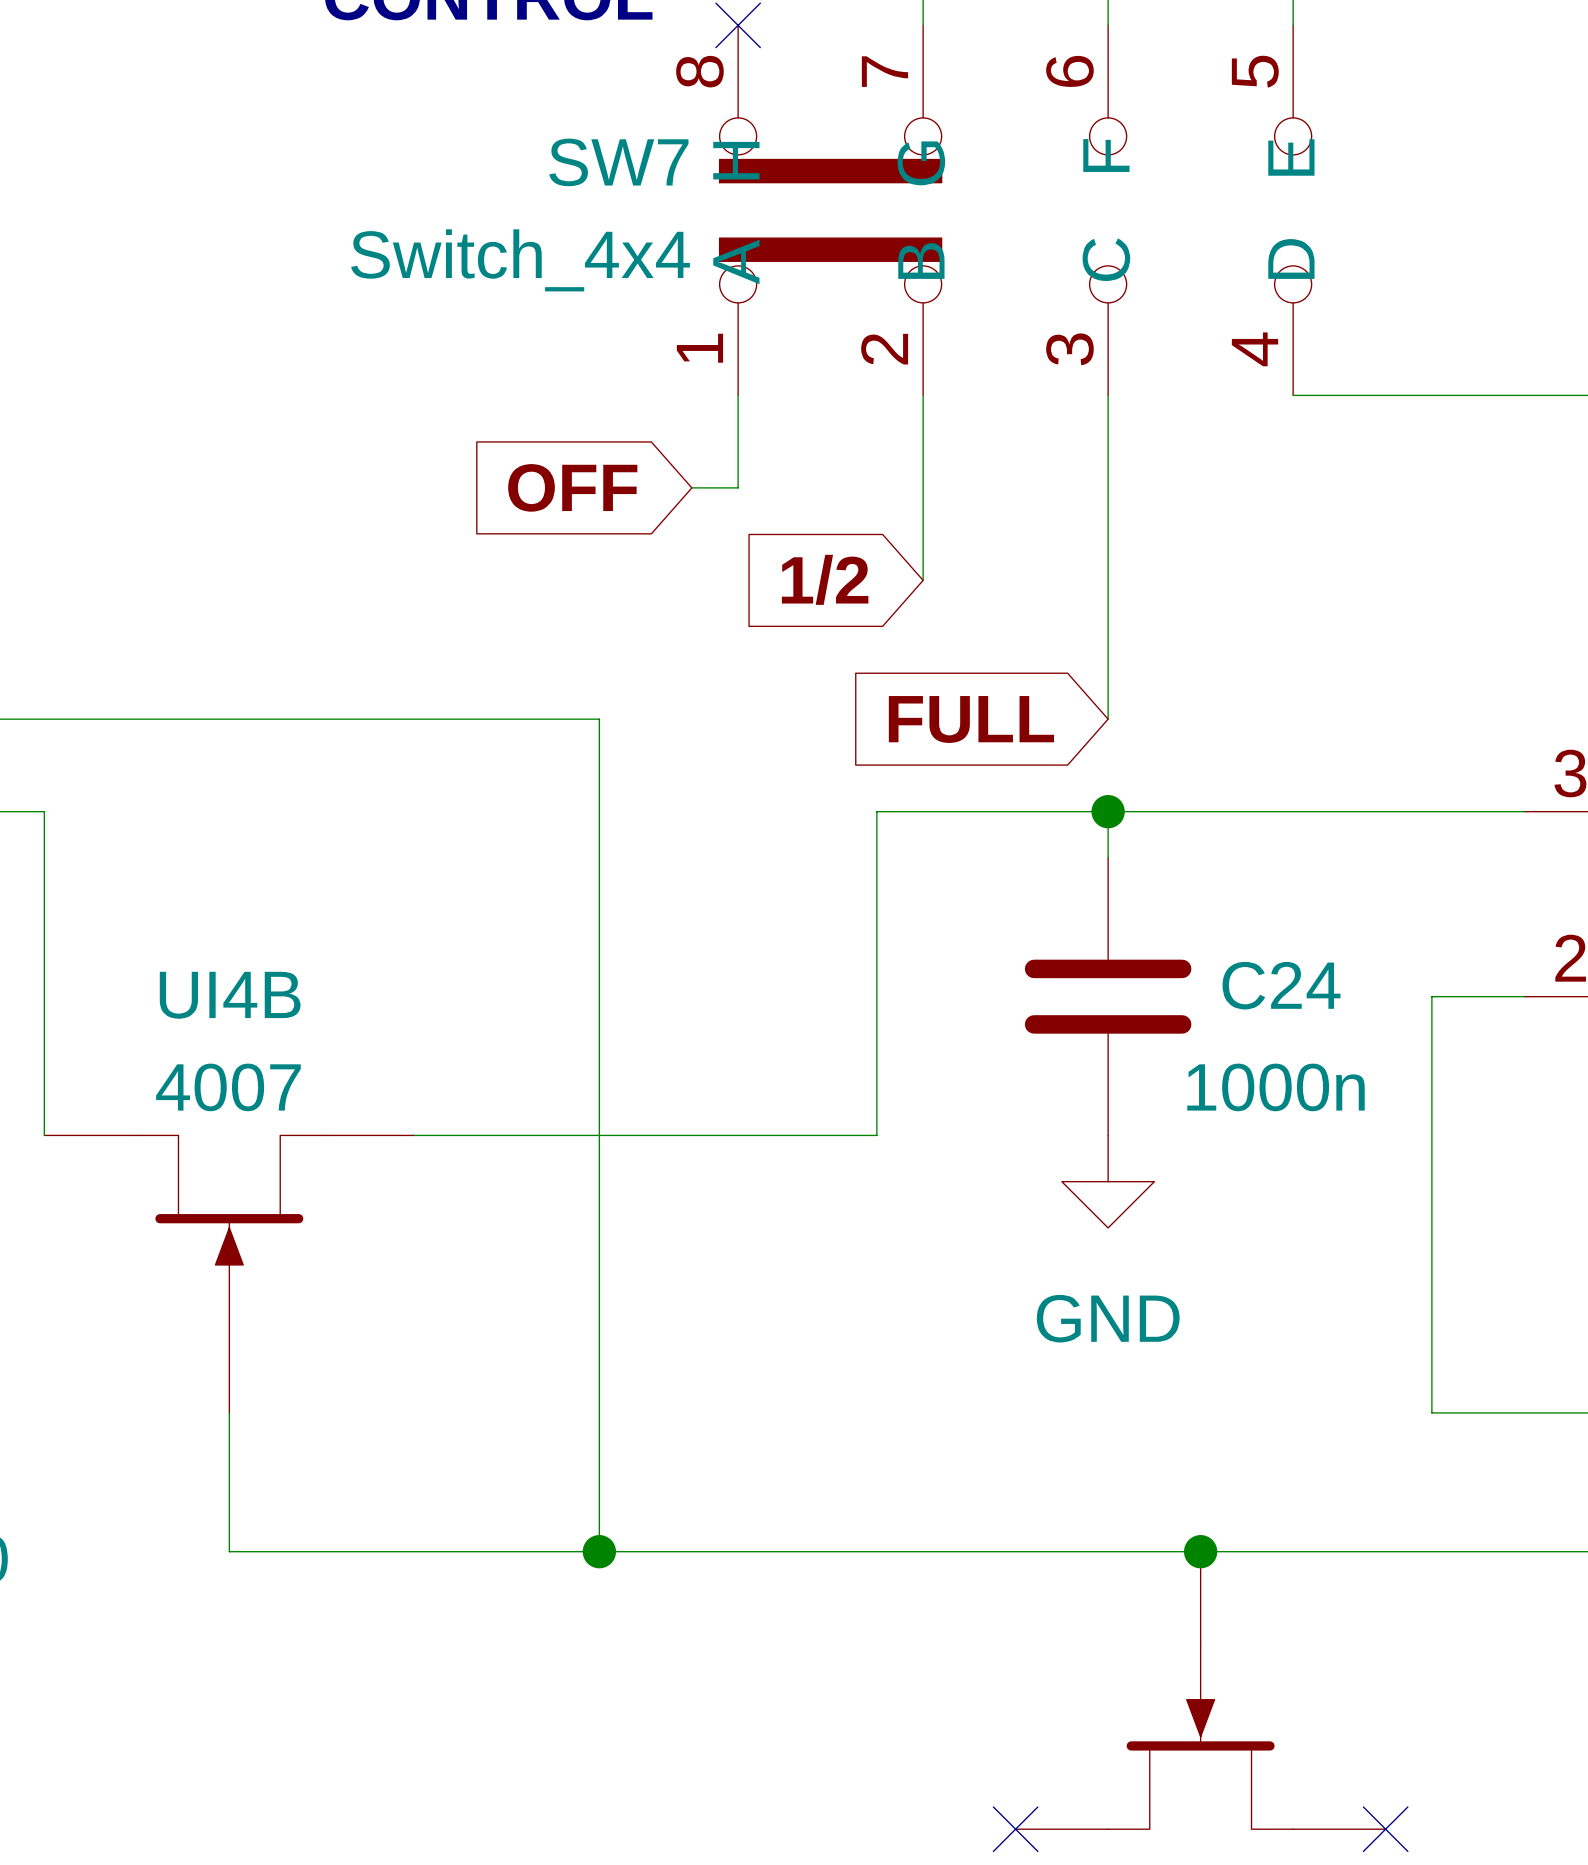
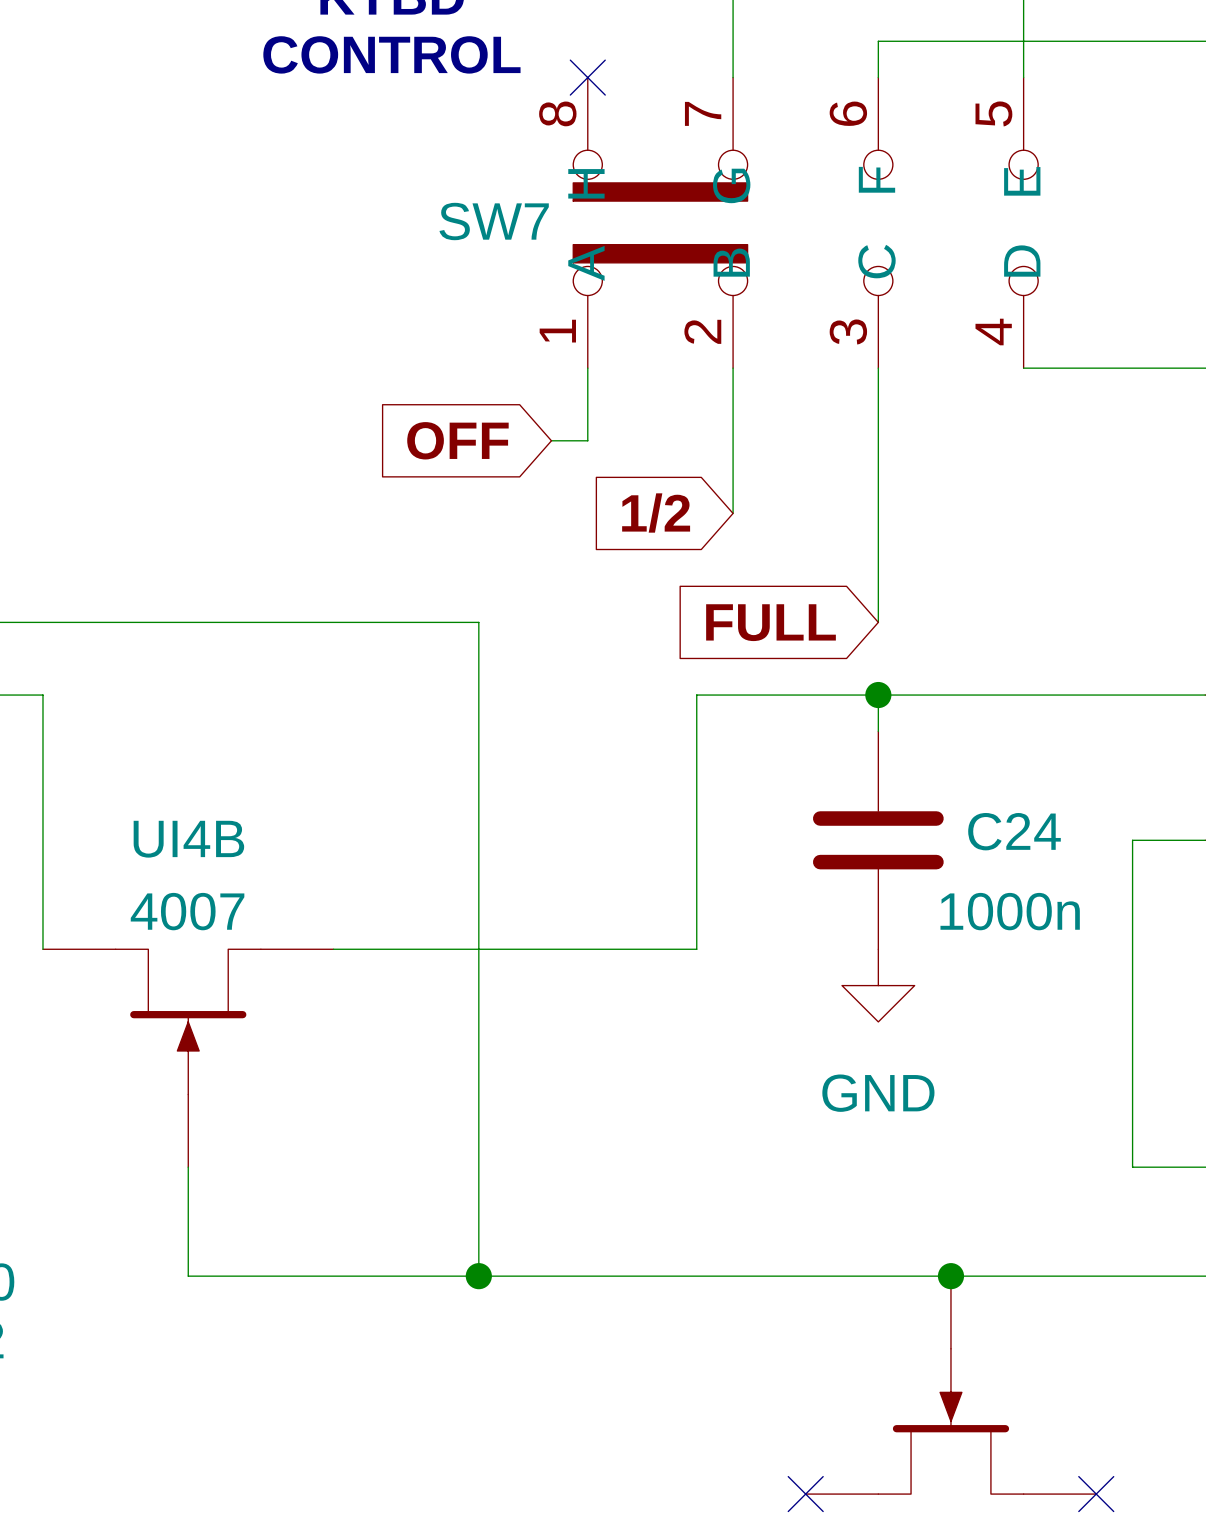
SW7 name position: SW7 (618, 162) -> SW7 (494, 221)
SW7 value: Switch_4x4 (520, 260) -> none

